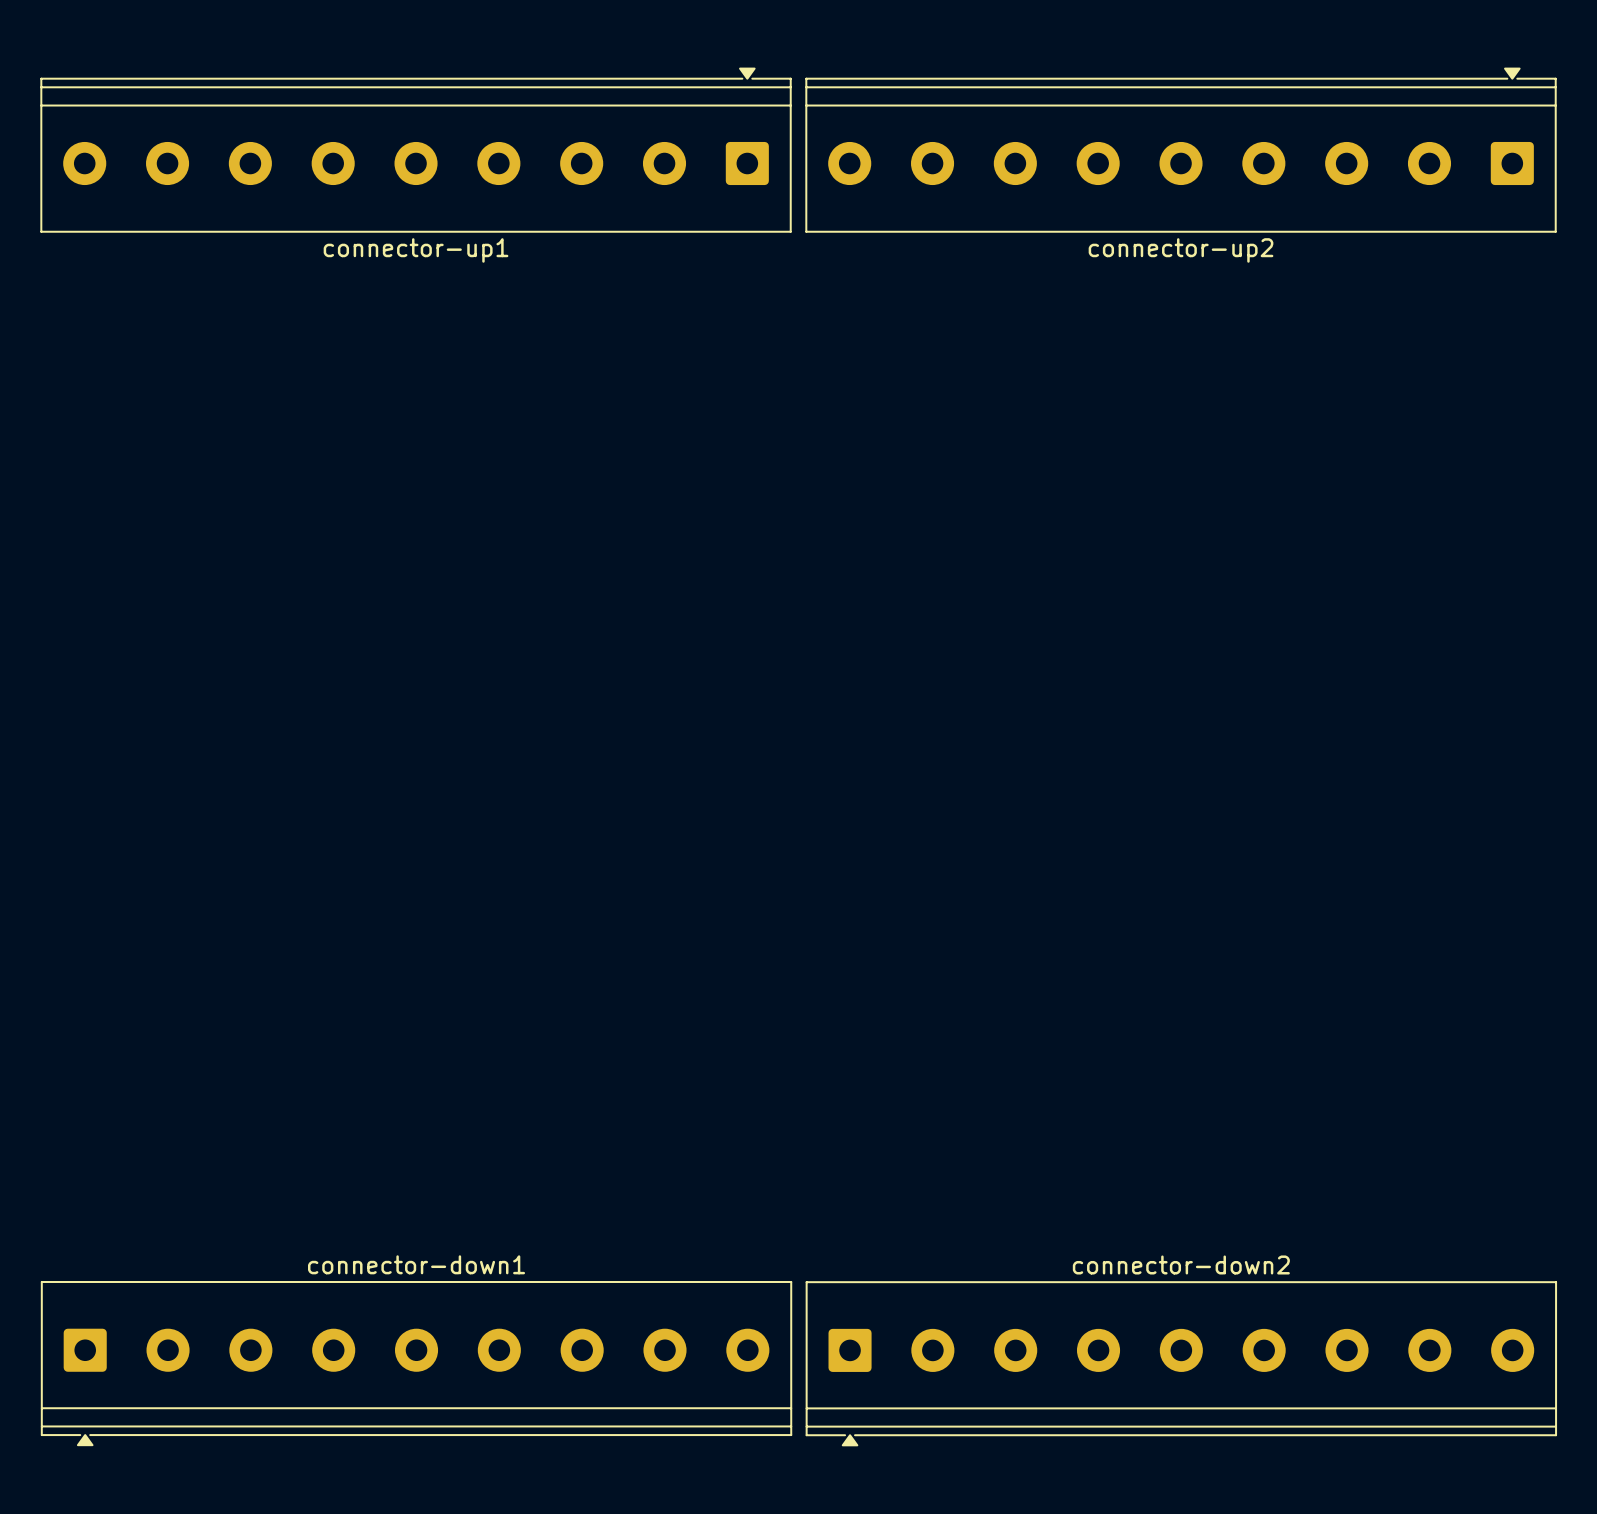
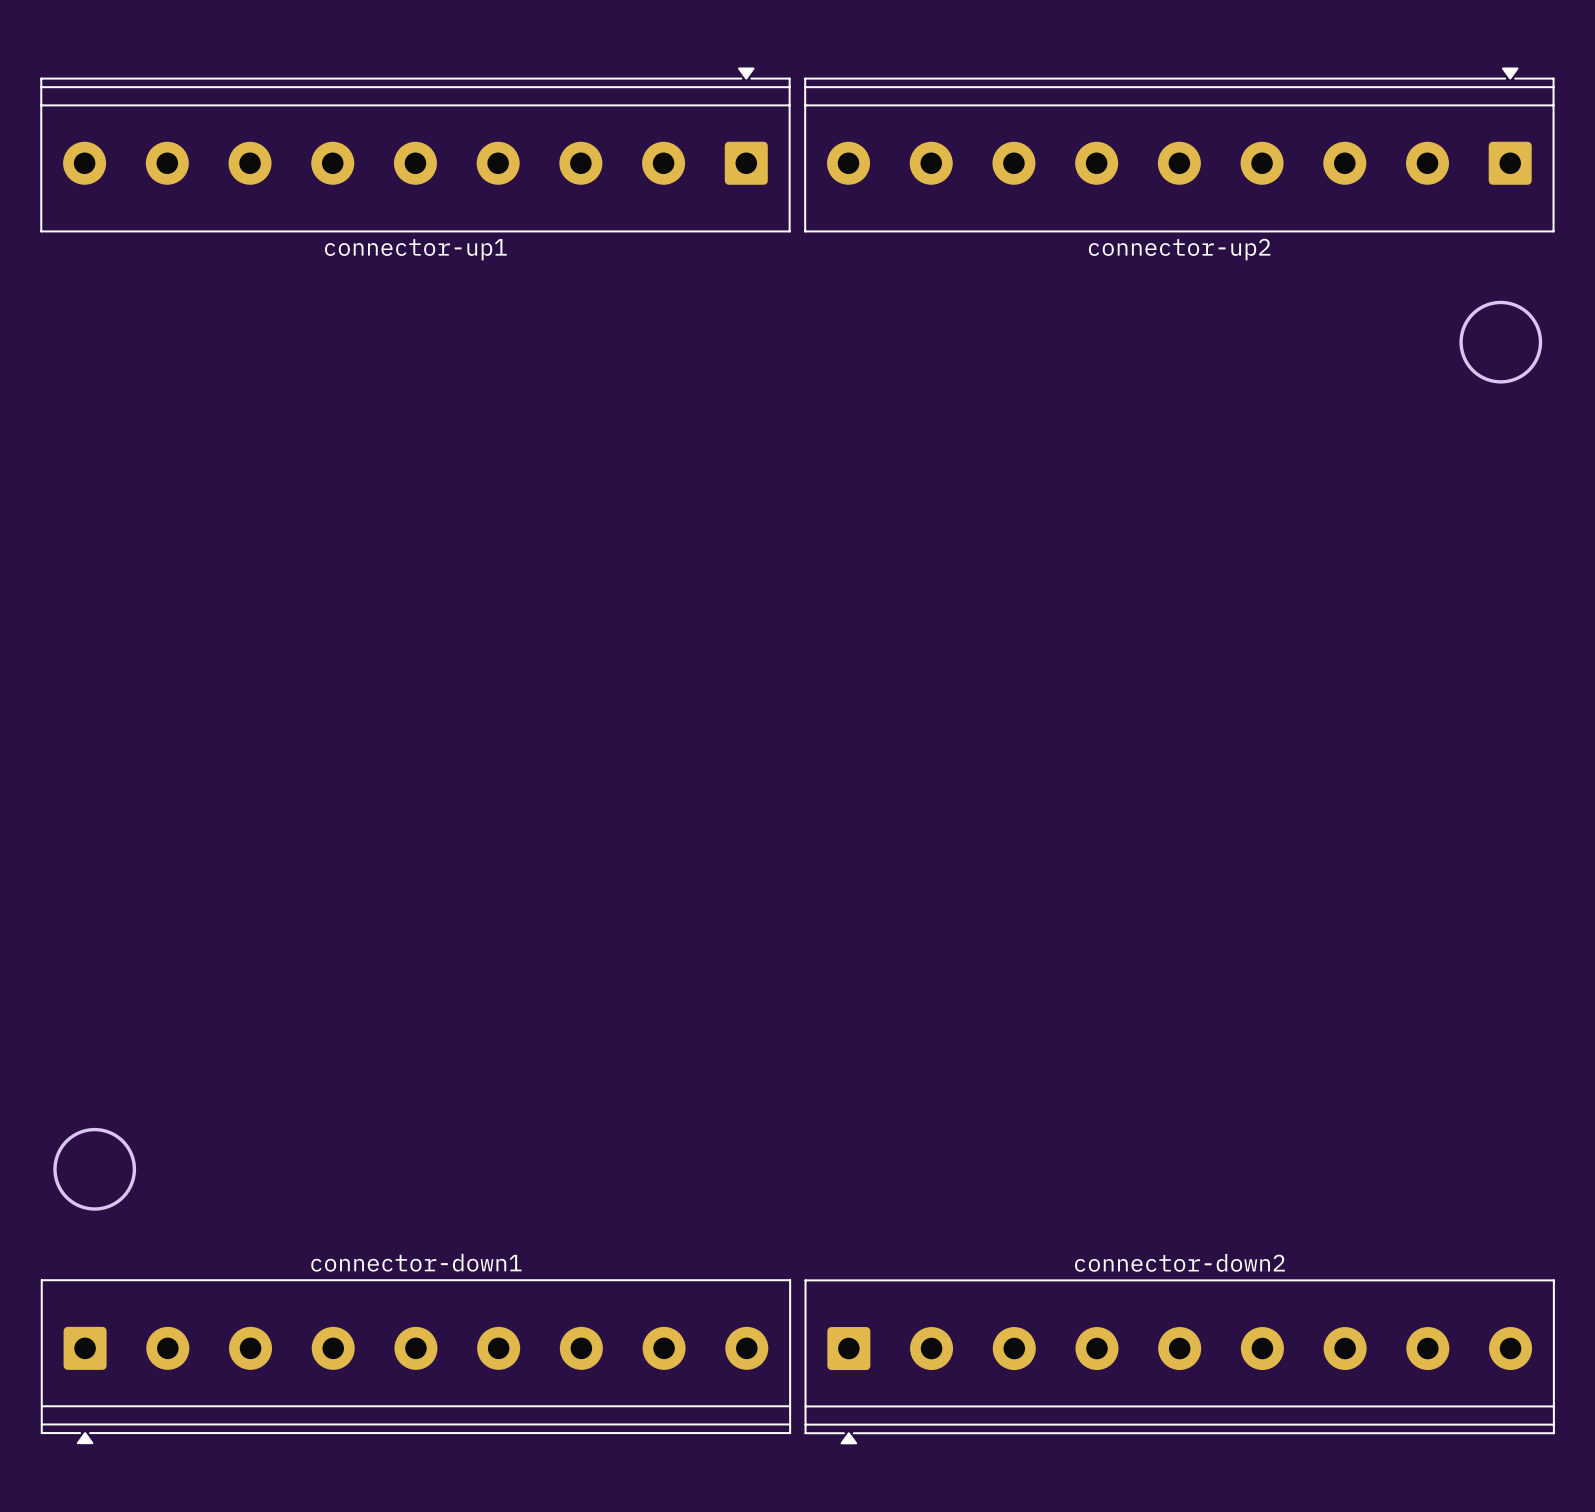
round board edge: none -> [1459, 300, 1543, 384]
round board edge: none -> [53, 1127, 137, 1211]

